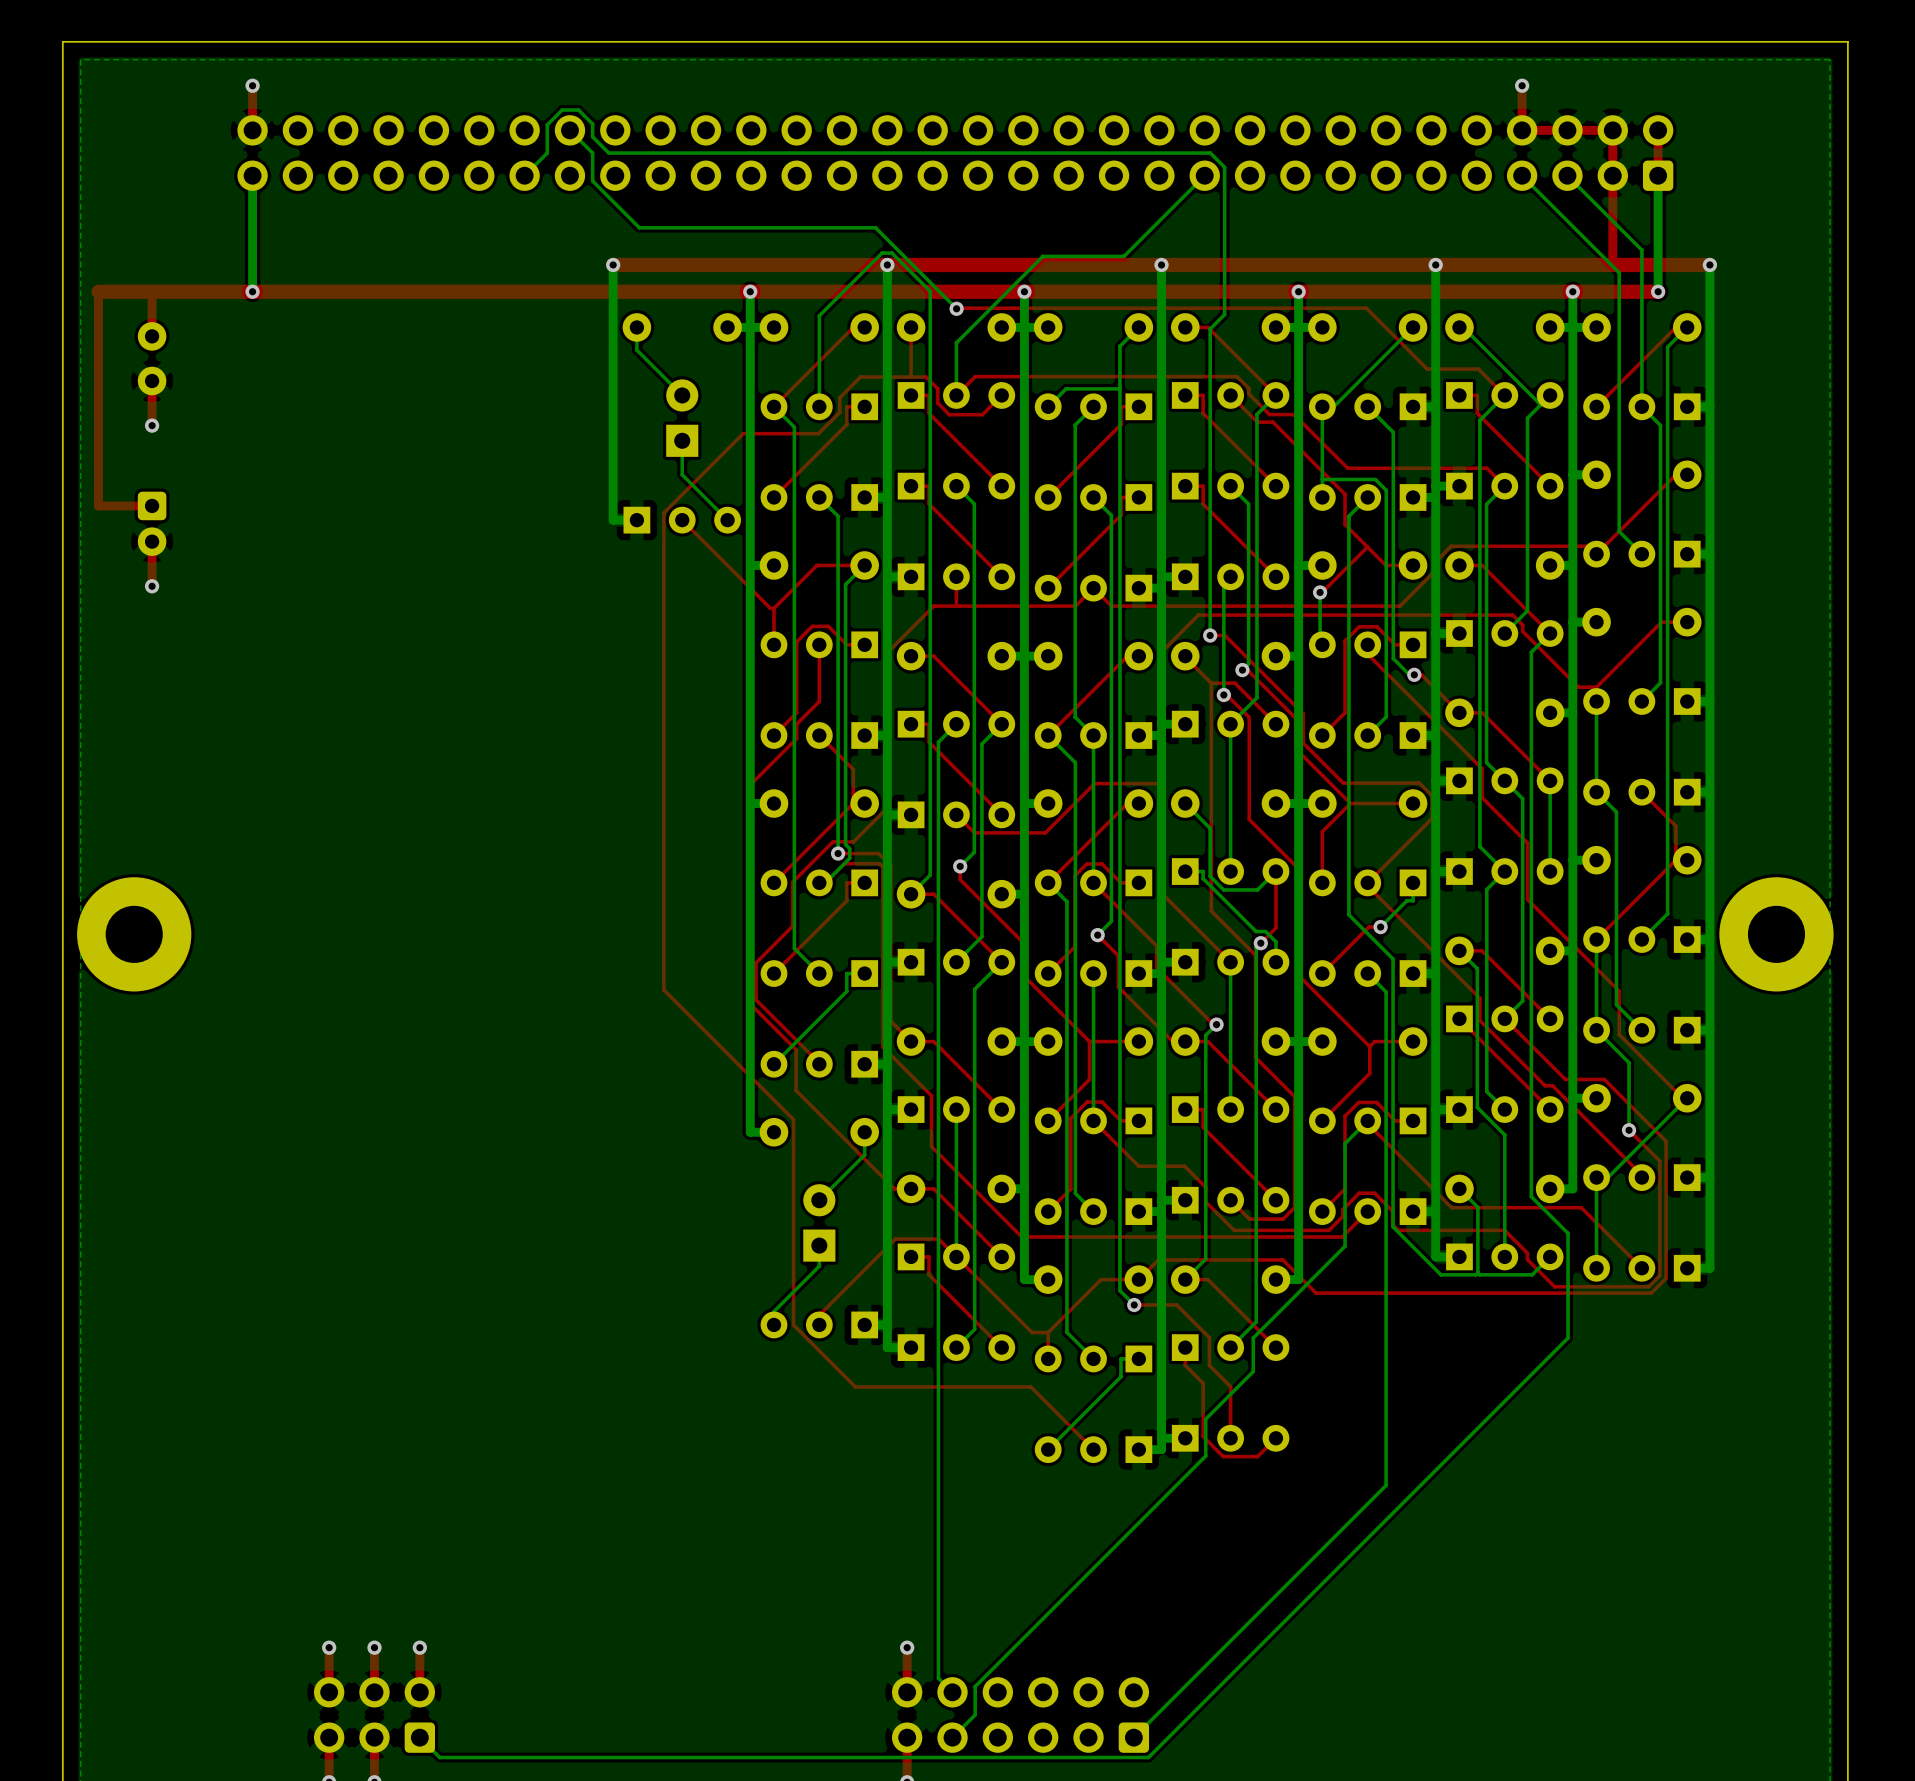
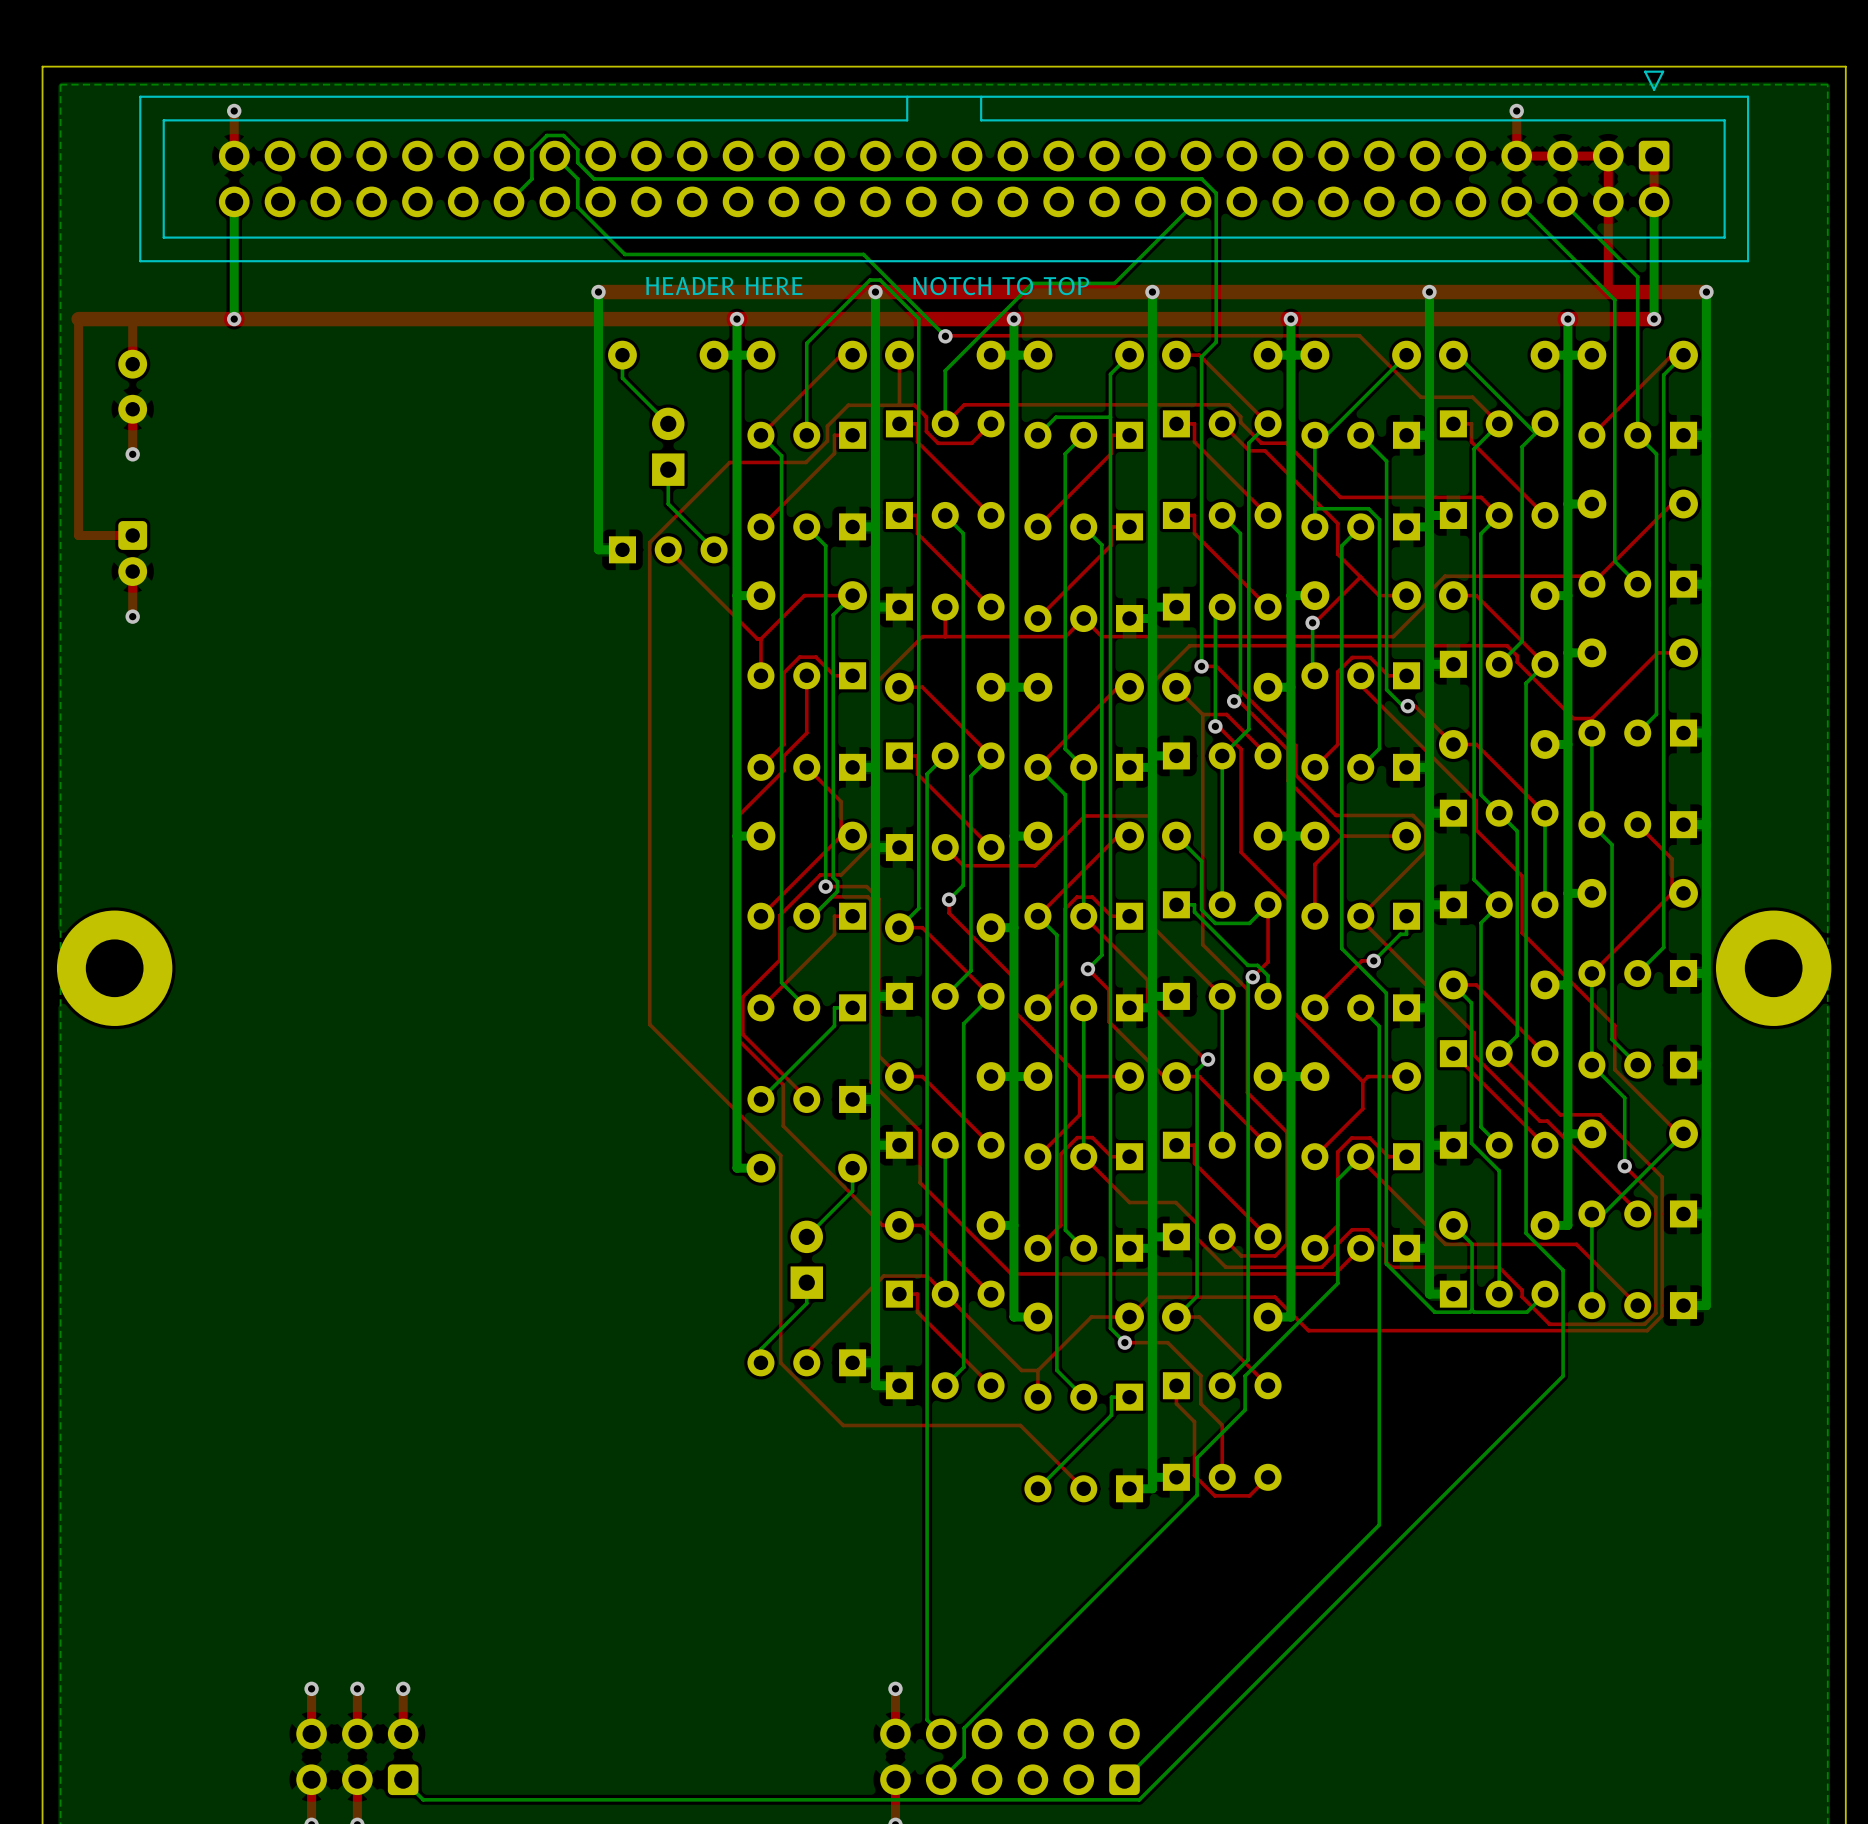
part side: top (955, 153) -> bottom (944, 166)
text: none -> HEADER HERE (724, 285)
text: none -> NOTCH TO TOP (1001, 286)

